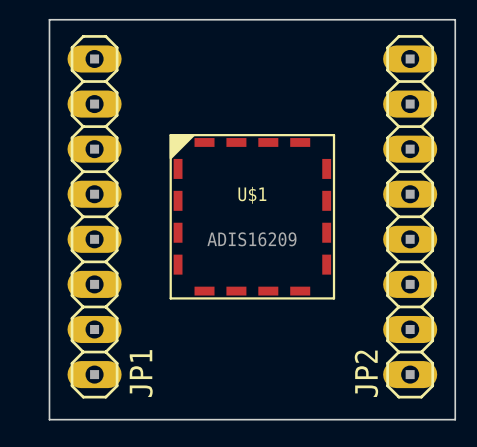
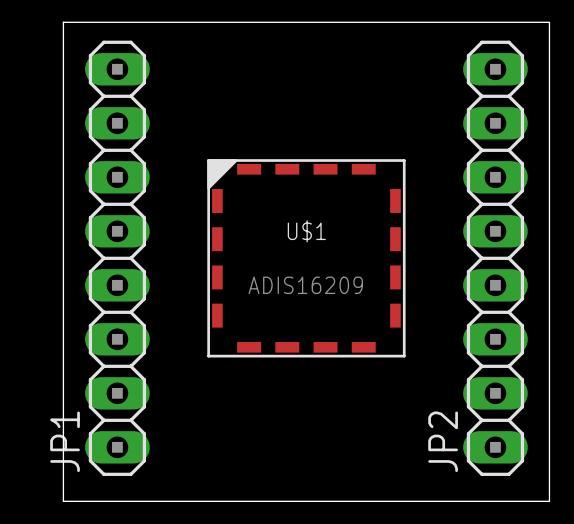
JP1 name position: JP1 (141, 373) -> JP1 (65, 441)

